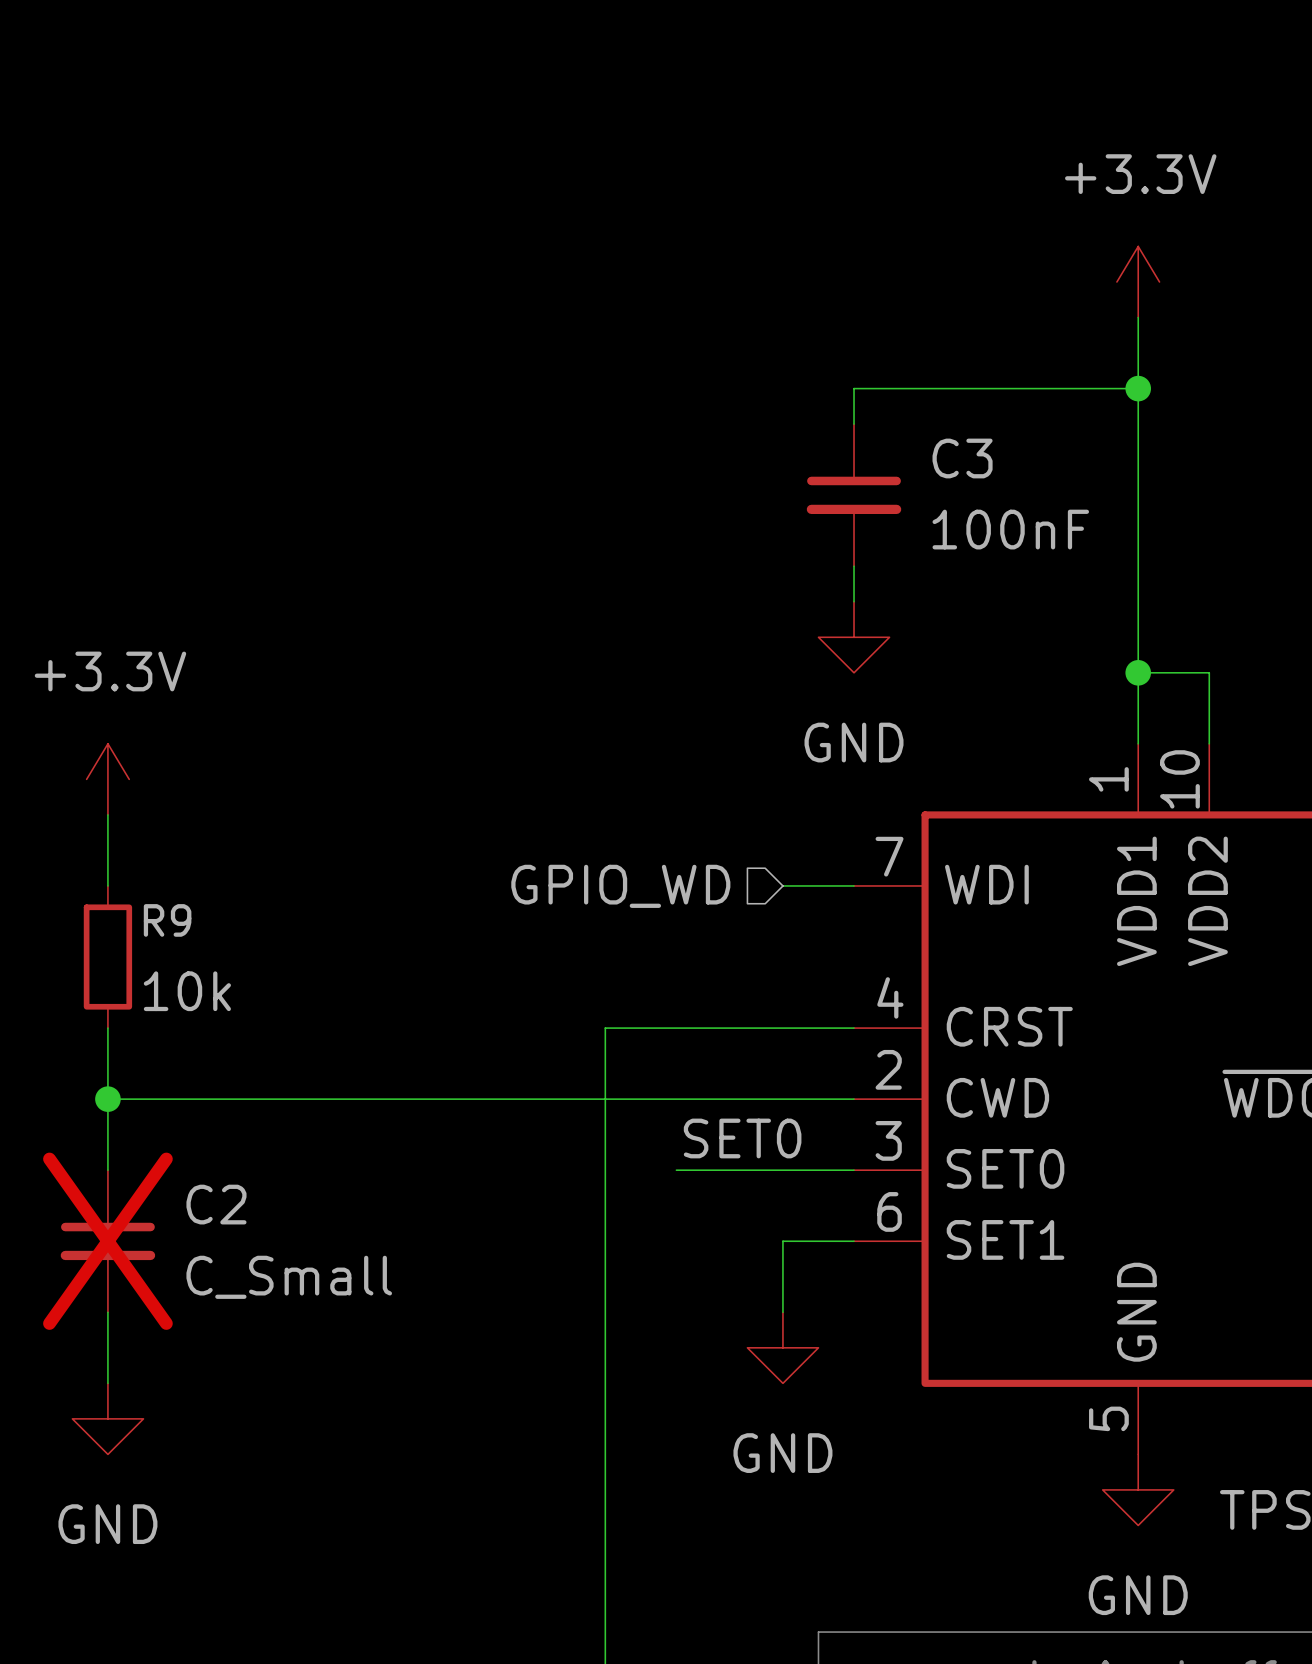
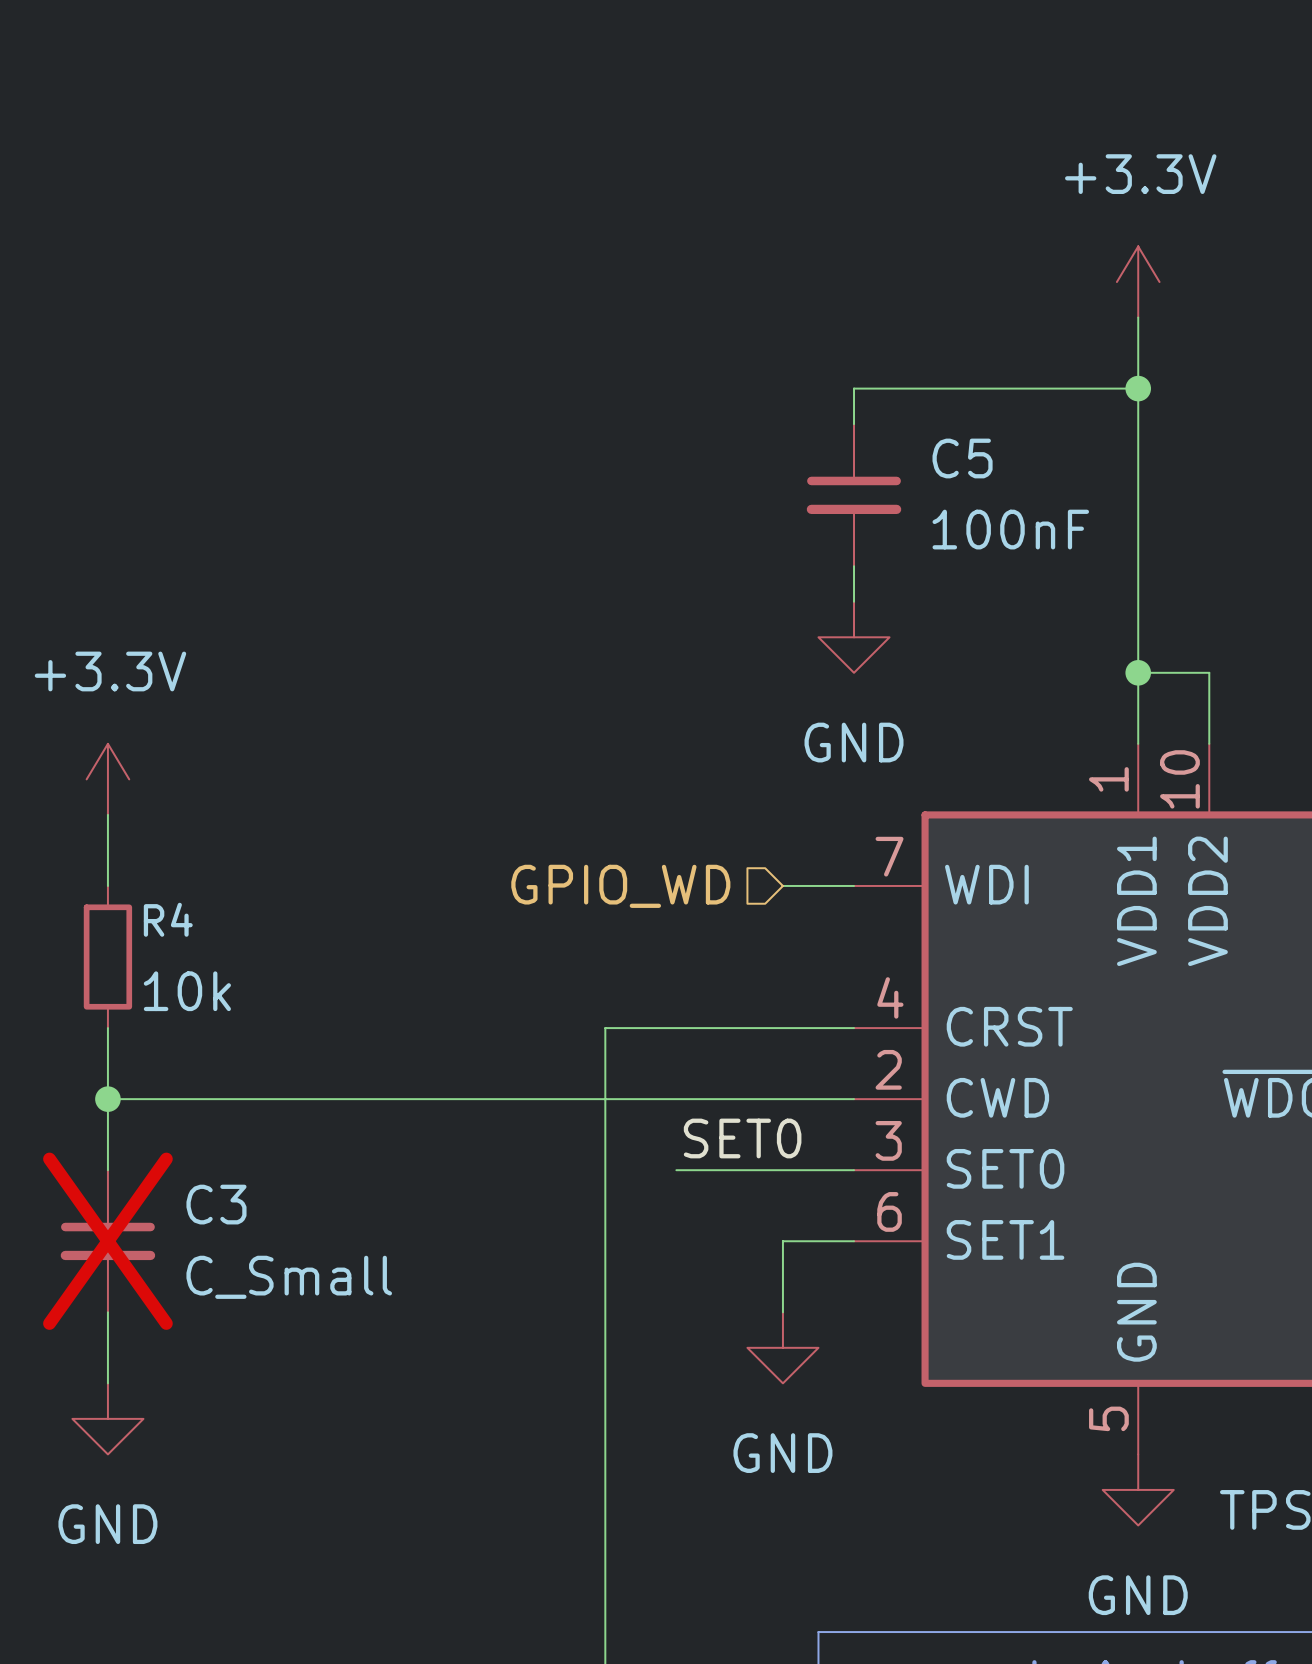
C3 name: C3 (962, 458) -> C5 (962, 458)
R9 name: R9 (167, 920) -> R4 (168, 919)
C2 name: C2 (216, 1204) -> C3 (216, 1204)

